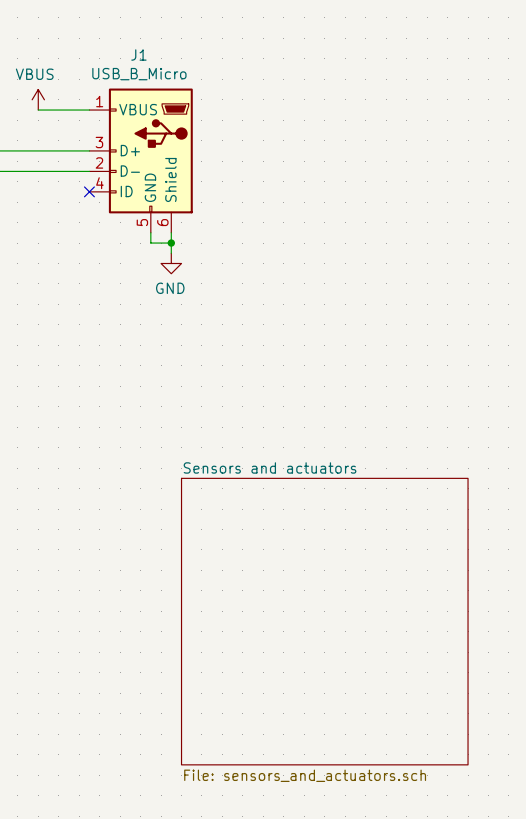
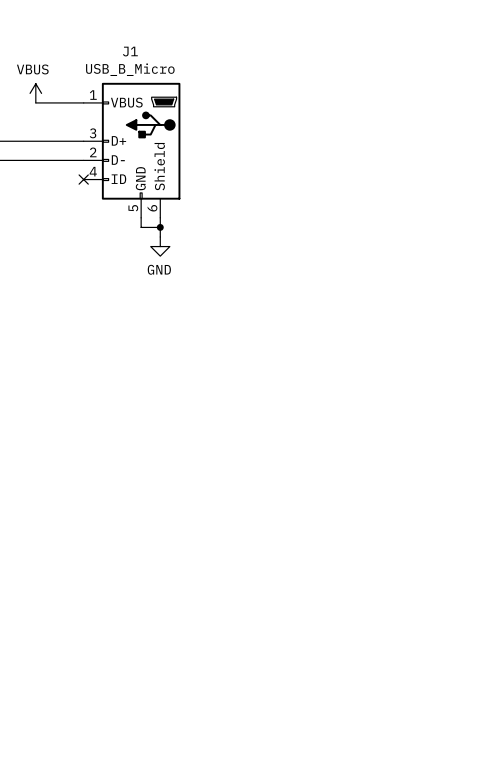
sheet Sensors and actuators: File: sensors_and_actuators.sch (324, 621) -> none

